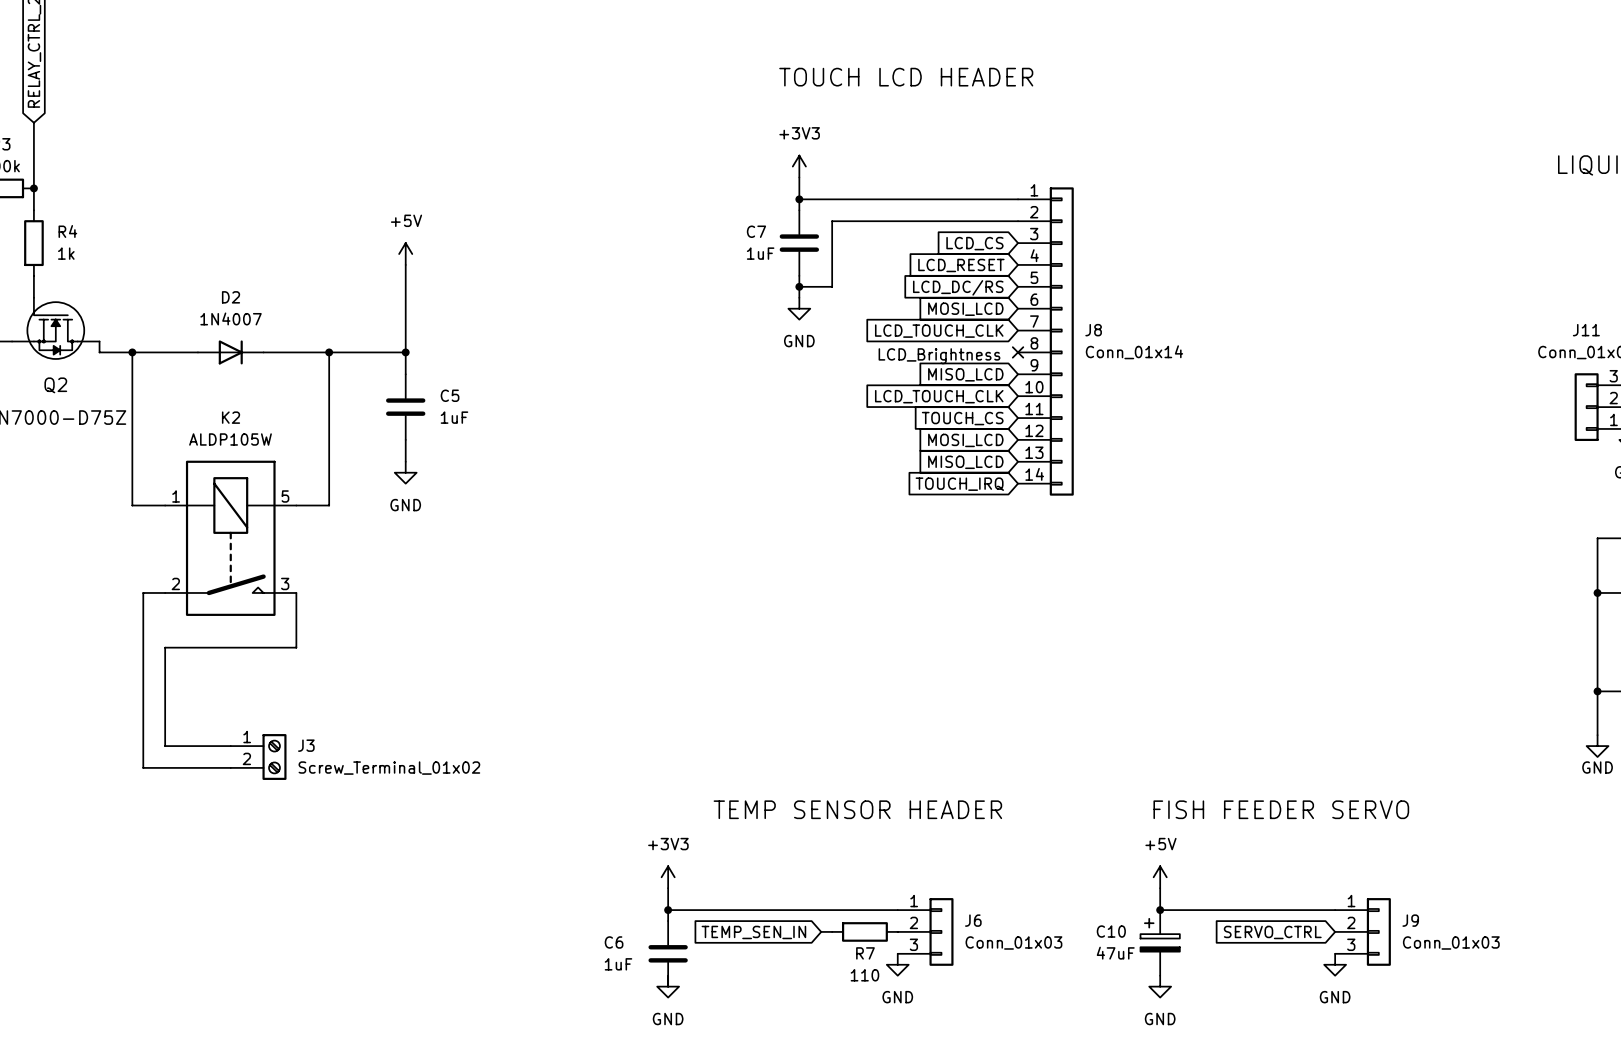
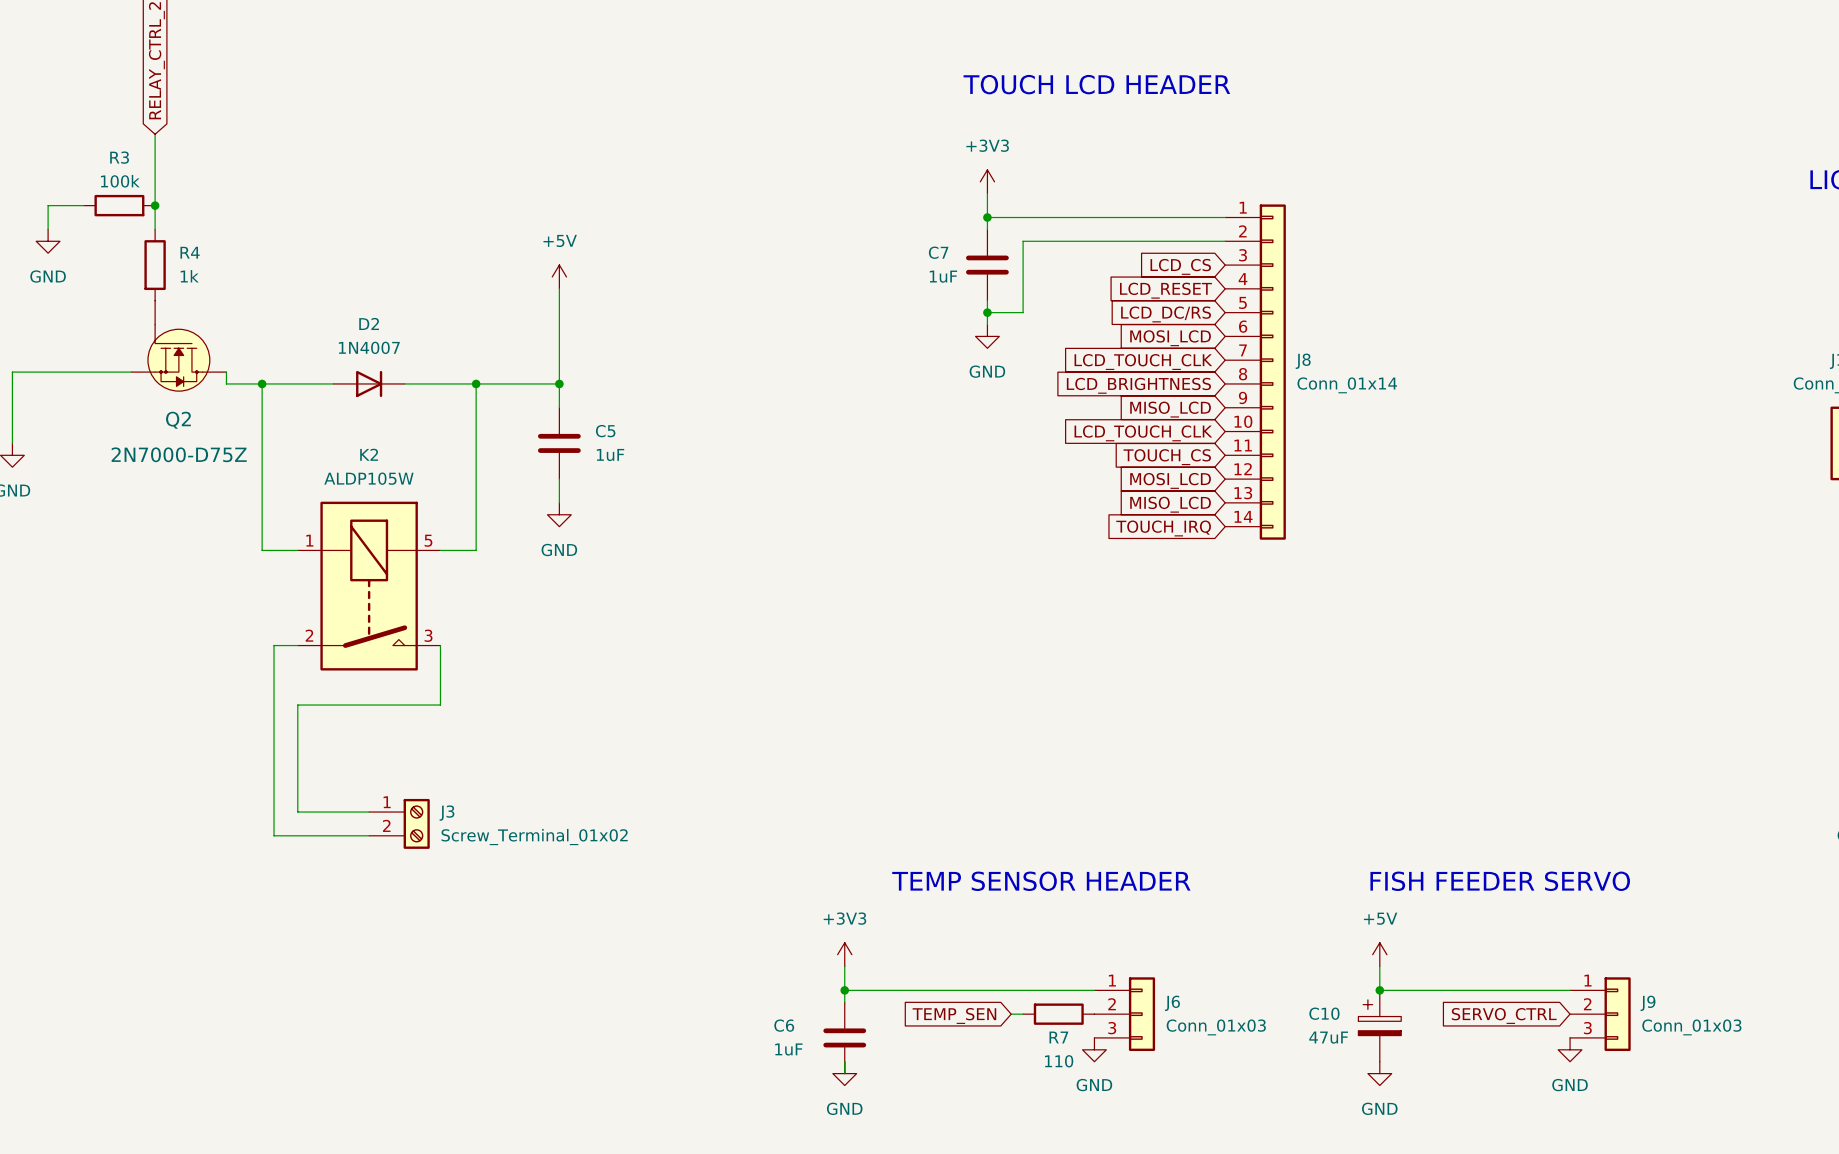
global label: none -> LCD_BRIGHTNESS (1138, 385)
no-connect mark: (1018, 352) -> none
text: LCD_Brightness (939, 356) -> none
global label: TEMP_SEN_IN (753, 932) -> TEMP_SEN (954, 1015)

